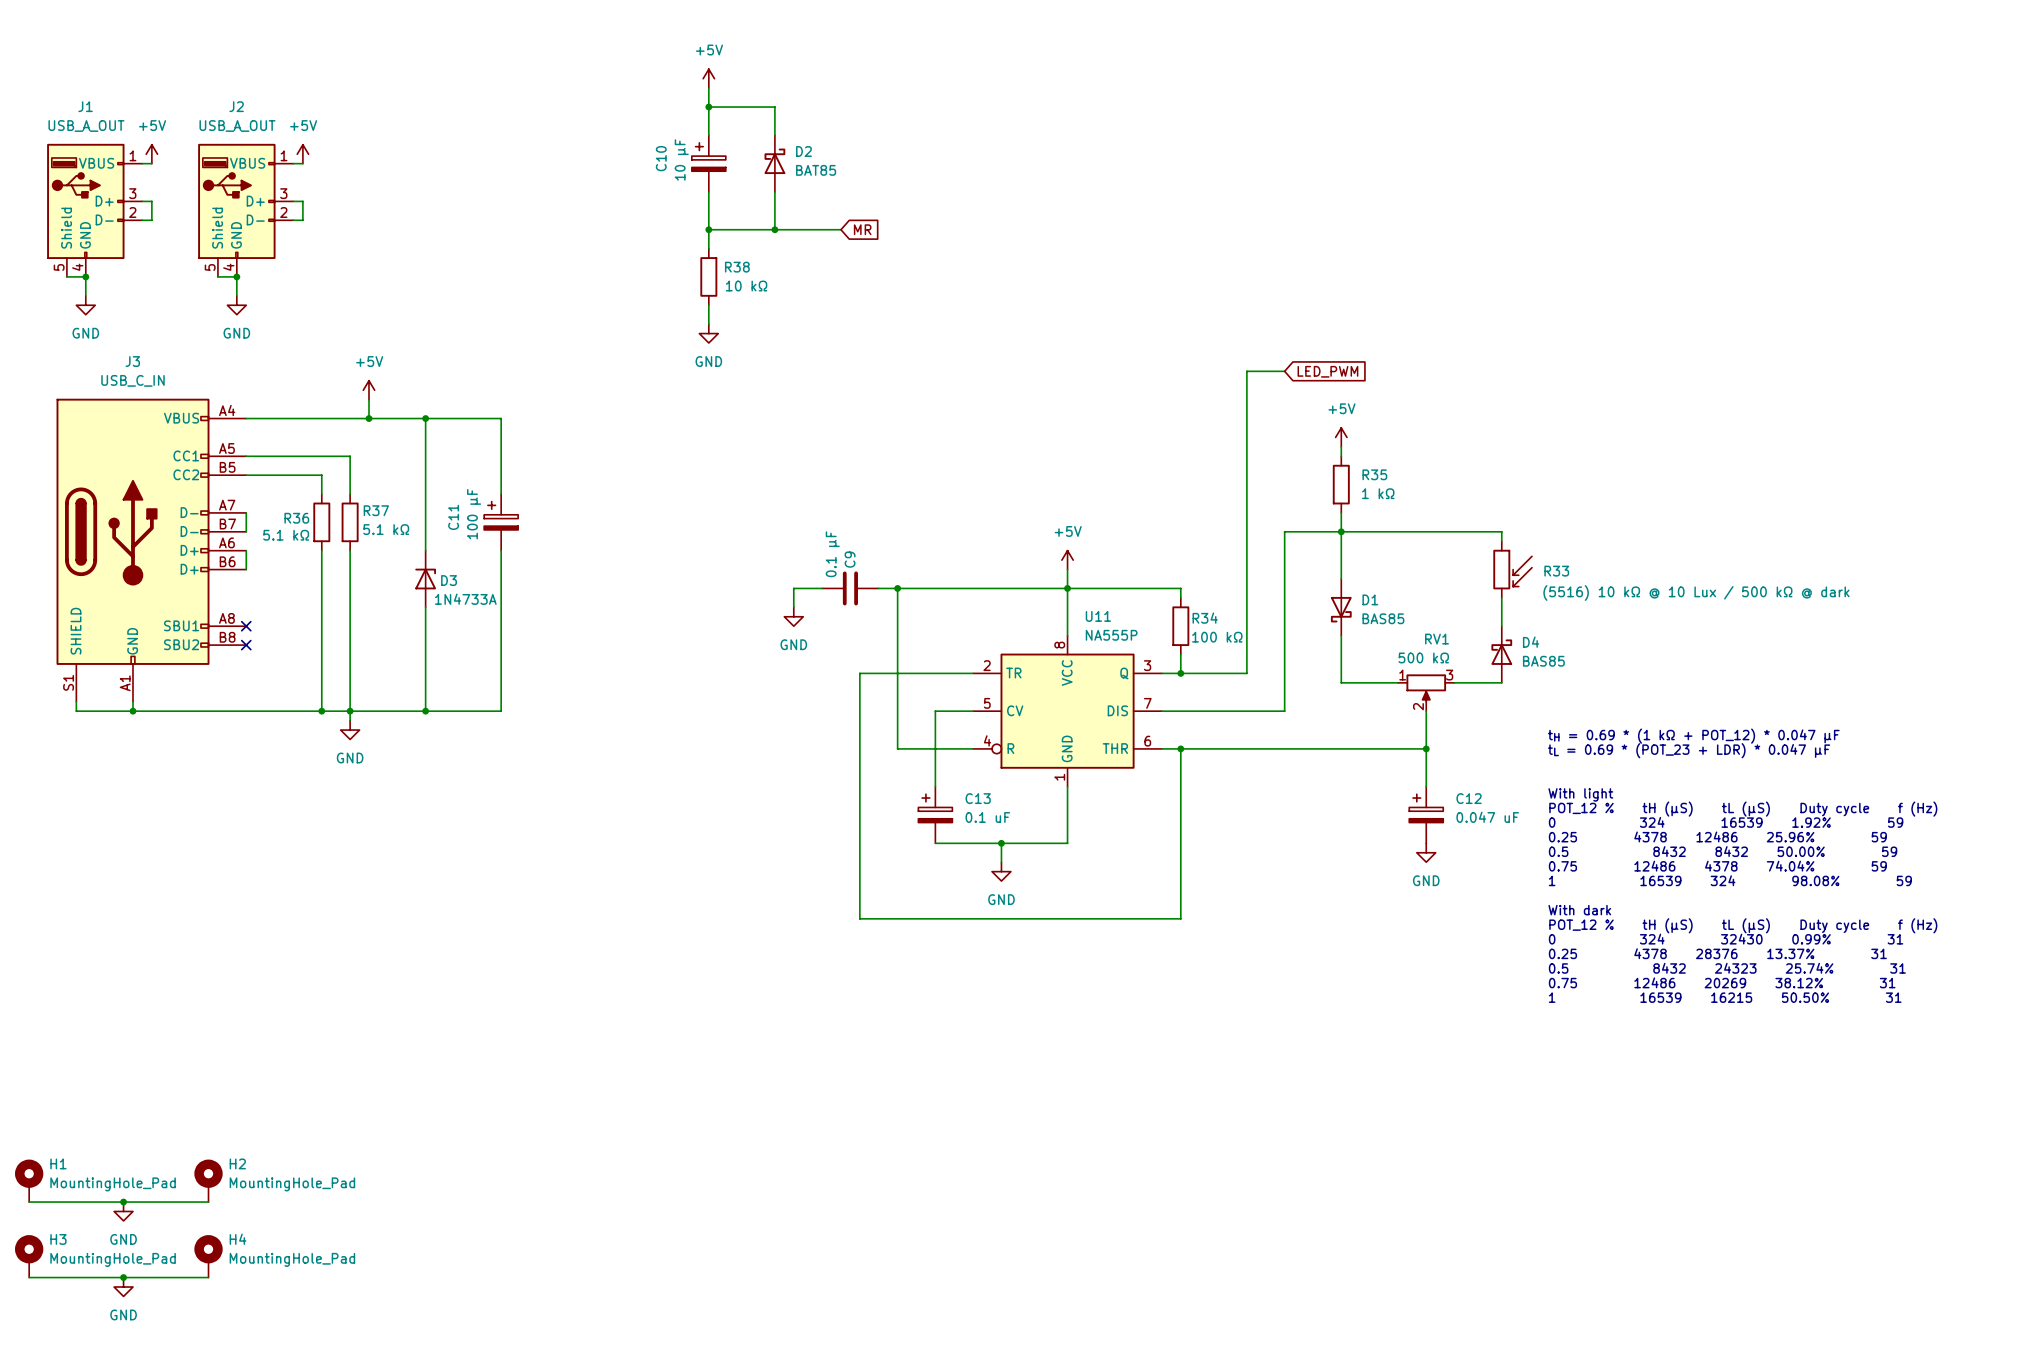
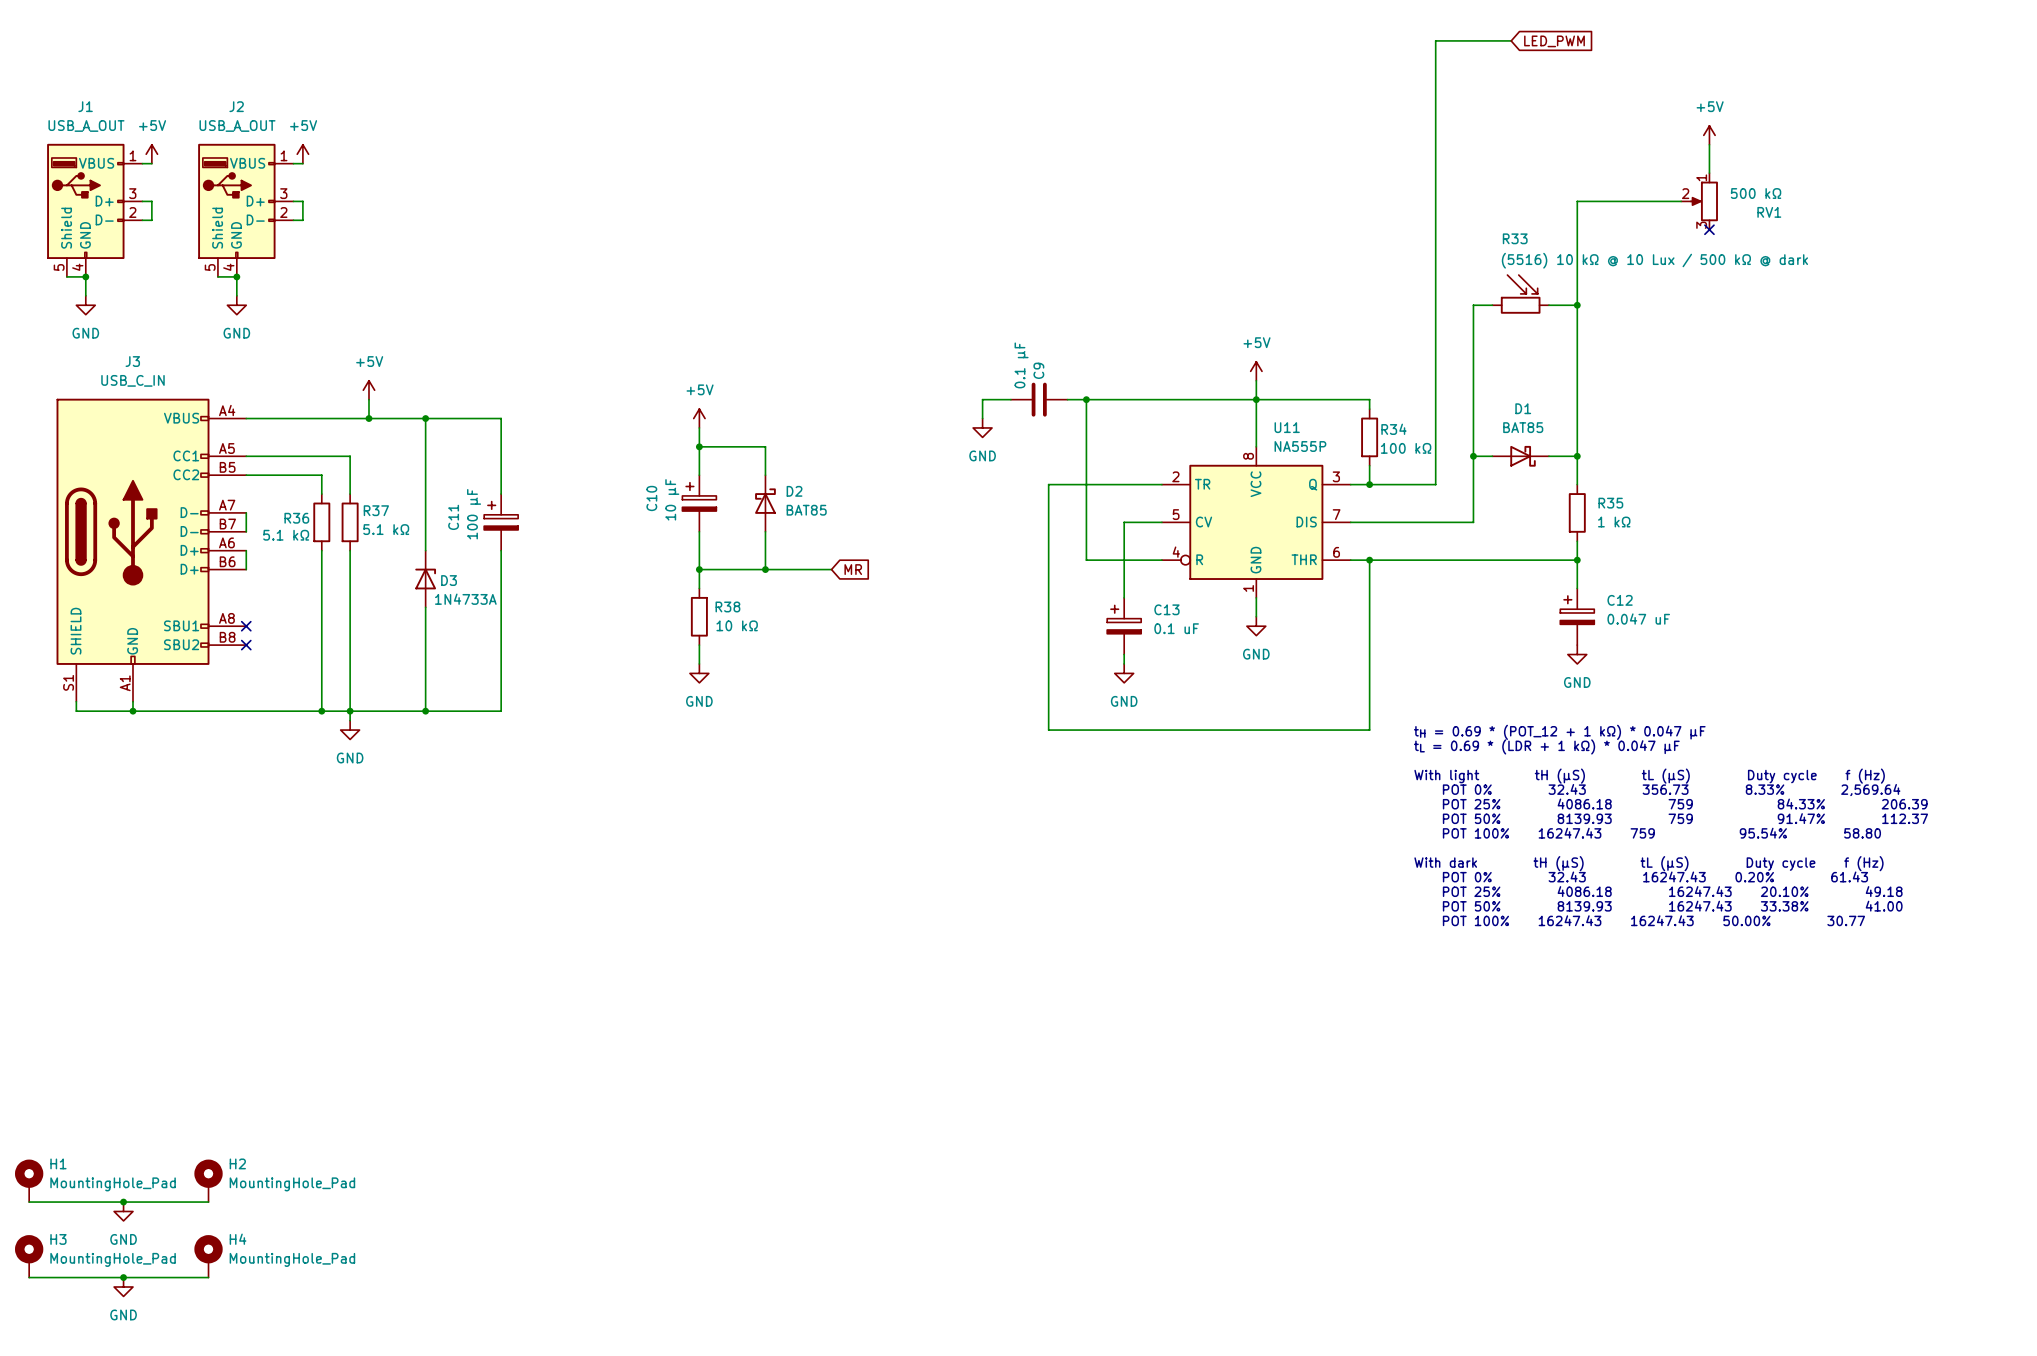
wire: none -> (1511, 40) (1435, 40) (1435, 484) (1350, 484)
global label: none -> LED_PWM (1554, 41)
power symbol: +5V (708, 78) -> none
wire: (708, 88) (708, 135) -> none
wire: (708, 107) (774, 107) (774, 135) -> none
junction: (708, 107) -> none
power symbol: none -> +5V (1709, 135)
wire: none -> (1709, 144) (1709, 173)
C10 position: (708, 163) -> (699, 503)
D2 position: (774, 163) -> (765, 503)
wire: (708, 191) (708, 248) -> none
wire: (774, 191) (774, 229) -> none
wire: none -> (1681, 201) (1577, 201) (1577, 484)
wire: (708, 229) (840, 229) -> none
junction: (708, 229) -> none
junction: (774, 229) -> none
global label: MR (862, 229) -> none
no-connect mark: none -> (1709, 229)
R38 position: (708, 276) -> (699, 616)
wire: (708, 305) (708, 324) -> none
wire: none -> (1492, 305) (1473, 305) (1473, 522) (1350, 522)
wire: none -> (1548, 305) (1577, 305)
junction: none -> (1577, 305)
power symbol: GND (708, 333) -> none
wire: (1284, 371) (1246, 371) (1246, 673) (1161, 673) -> none
global label: LED_PWM (1327, 371) -> none
wire: none -> (1010, 399) (982, 399) (982, 418)
wire: none -> (1067, 399) (1369, 399) (1369, 409)
wire: none -> (1086, 399) (1086, 560) (1161, 560)
junction: none -> (1086, 399)
junction: none -> (1256, 399)
power symbol: none -> +5V (699, 418)
wire: none -> (699, 427) (699, 475)
power symbol: none -> GND (982, 427)
power symbol position: +5V (1341, 437) -> +5V (1256, 371)
wire: none -> (699, 446) (765, 446) (765, 475)
junction: none -> (699, 446)
wire: (1341, 446) (1341, 456) -> none
wire: none -> (1473, 456) (1492, 456)
junction: none -> (1473, 456)
wire: none -> (1548, 456) (1577, 456)
junction: none -> (1577, 456)
wire: none -> (1369, 465) (1369, 484)
wire: none -> (1161, 484) (1048, 484) (1048, 730) (1369, 730) (1369, 560)
R35 position: (1341, 484) -> (1577, 512)
junction: none -> (1369, 484)
wire: (1341, 512) (1341, 579) -> (1256, 380) (1256, 446)
wire: none -> (1161, 522) (1124, 522) (1124, 597)
wire: none -> (699, 531) (699, 588)
wire: none -> (765, 531) (765, 569)
junction: (1341, 531) -> none
wire: (1501, 541) (1501, 531) (1284, 531) (1284, 711) (1161, 711) -> none
wire: none -> (1577, 541) (1577, 588)
power symbol: +5V (1067, 560) -> none
wire: none -> (1350, 560) (1577, 560)
junction: none -> (1369, 560)
junction: none -> (1577, 560)
wire: none -> (699, 569) (831, 569)
junction: none -> (699, 569)
junction: none -> (765, 569)
global label: none -> MR (853, 569)
wire: (1067, 569) (1067, 635) -> none
R33 rotation: 0° (1512, 569) -> 90° counterclockwise (1520, 294)
R33 position: (1512, 569) -> (1520, 294)
wire: (822, 588) (793, 588) (793, 607) -> none
C9 position: (850, 588) -> (1039, 399)
wire: (878, 588) (1180, 588) (1180, 597) -> none
wire: (897, 588) (897, 748) (973, 748) -> none
junction: (897, 588) -> none
junction: (1067, 588) -> none
R33 value position: (5516) 10 kΩ @ 10 Lux / 500 kΩ @ dark (1696, 593) -> (5516) 10 kΩ @ 10 Lux / 500 kΩ @ dark (1654, 260)
wire: (1501, 597) (1501, 626) -> none
D1 name position: D1 (1370, 599) -> D1 (1523, 408)
D1 position: (1341, 607) -> (1520, 456)
D1 rotation: 0° (1341, 609) -> 90° counterclockwise (1523, 456)
power symbol position: GND (793, 616) -> GND (699, 673)
D1 value: BAS85 (1383, 618) -> BAT85 (1523, 427)
R34 position: (1180, 626) -> (1369, 437)
power symbol: none -> GND (1256, 626)
wire: (1341, 635) (1341, 682) (1397, 682) -> none
wire: none -> (699, 645) (699, 663)
wire: (1180, 654) (1180, 673) -> (1256, 597) (1256, 616)
D4: BAS85 (1501, 654) -> none
power symbol: none -> GND (1577, 654)
RV1 value position: 500 kΩ (1423, 657) -> 500 kΩ (1756, 193)
wire: (973, 673) (859, 673) (859, 918) (1180, 918) (1180, 748) -> none
power symbol: none -> GND (1124, 673)
junction: (1180, 673) -> none
wire: (1454, 682) (1501, 682) -> none
RV1 rotation: 0° (1426, 688) -> 90° clockwise (1704, 201)
RV1 position: (1426, 692) -> (1699, 201)
wire: (973, 711) (935, 711) (935, 786) -> none
U11 position: (1067, 711) -> (1256, 522)
wire: (1426, 711) (1426, 786) -> none
text: none -> tH = 0.69 * (POT_12 + 1 kΩ) * 0.047 µF (1559, 732)
text: tH = 0.69 * (1 kΩ + POT_12) * 0.047 µF (1693, 736) -> none
text: none -> tL = 0.69 * (LDR + 1 kΩ) * 0.047 µF (1546, 746)
wire: (1161, 748) (1426, 748) -> none
junction: (1180, 748) -> none
junction: (1426, 748) -> none
text: tL = 0.69 * (POT_23 + LDR) * 0.047 µF (1689, 750) -> none
text: none -> With light tH (µS) tL (µS) Duty cycle f (Hz) (1649, 776)
wire: (1067, 786) (1067, 843) (935, 843) -> none
text: none -> POT 0% 32.43 356.73 8.33% 2,569.64 (1671, 790)
text: With light (1580, 794) -> none
text: none -> POT 25% 4086.18 759 84.33% 206.39 (1685, 804)
text: POT_12 % tH (µS) tL (µS) Duty cycle f (Hz) (1743, 809) -> none
C13 position: (935, 815) -> (1124, 626)
C12 position: (1426, 815) -> (1577, 616)
text: none -> POT 50% 8139.93 759 91.47% 112.37 (1685, 818)
text: 0 324 16539 1.92% 59 (1726, 822) -> none
text: none -> POT 100% 16247.43 759 95.54% 58.80 (1661, 833)
text: 0.25 4378 12486 25.96% 59 (1717, 836) -> none
wire: (1001, 843) (1001, 862) -> none
junction: (1001, 843) -> none
text: 0.5 8432 8432 50.00% 59 (1723, 851) -> none
power symbol: GND (1426, 852) -> none
text: none -> With dark tH (µS) tL (µS) Duty cycle f (Hz) (1648, 863)
text: 0.75 12486 4378 74.04% 59 (1717, 866) -> none
power symbol: GND (1001, 871) -> none
text: none -> POT 0% 32.43 16247.43 0.20% 61.43 (1655, 876)
text: 1 16539 324 98.08% 59 (1730, 880) -> none
text: none -> POT 25% 4086.18 16247.43 20.10% 49.18 (1672, 891)
text: none -> POT 50% 8139.93 16247.43 33.38% 41.00 (1672, 906)
text: With dark (1579, 910) -> none
text: none -> POT 100% 16247.43 16247.43 50.00% 30.77 (1653, 920)
text: POT_12 % tH (µS) tL (µS) Duty cycle f (Hz) (1743, 925) -> none
text: 0 324 32430 0.99% 31 (1726, 939) -> none
text: 0.25 4378 28376 13.37% 31 (1717, 953) -> none
text: 0.5 8432 24323 25.74% 31 (1727, 968) -> none
text: 0.75 12486 20269 38.12% 31 (1722, 982) -> none
text: 1 16539 16215 50.50% 31 (1725, 997) -> none

